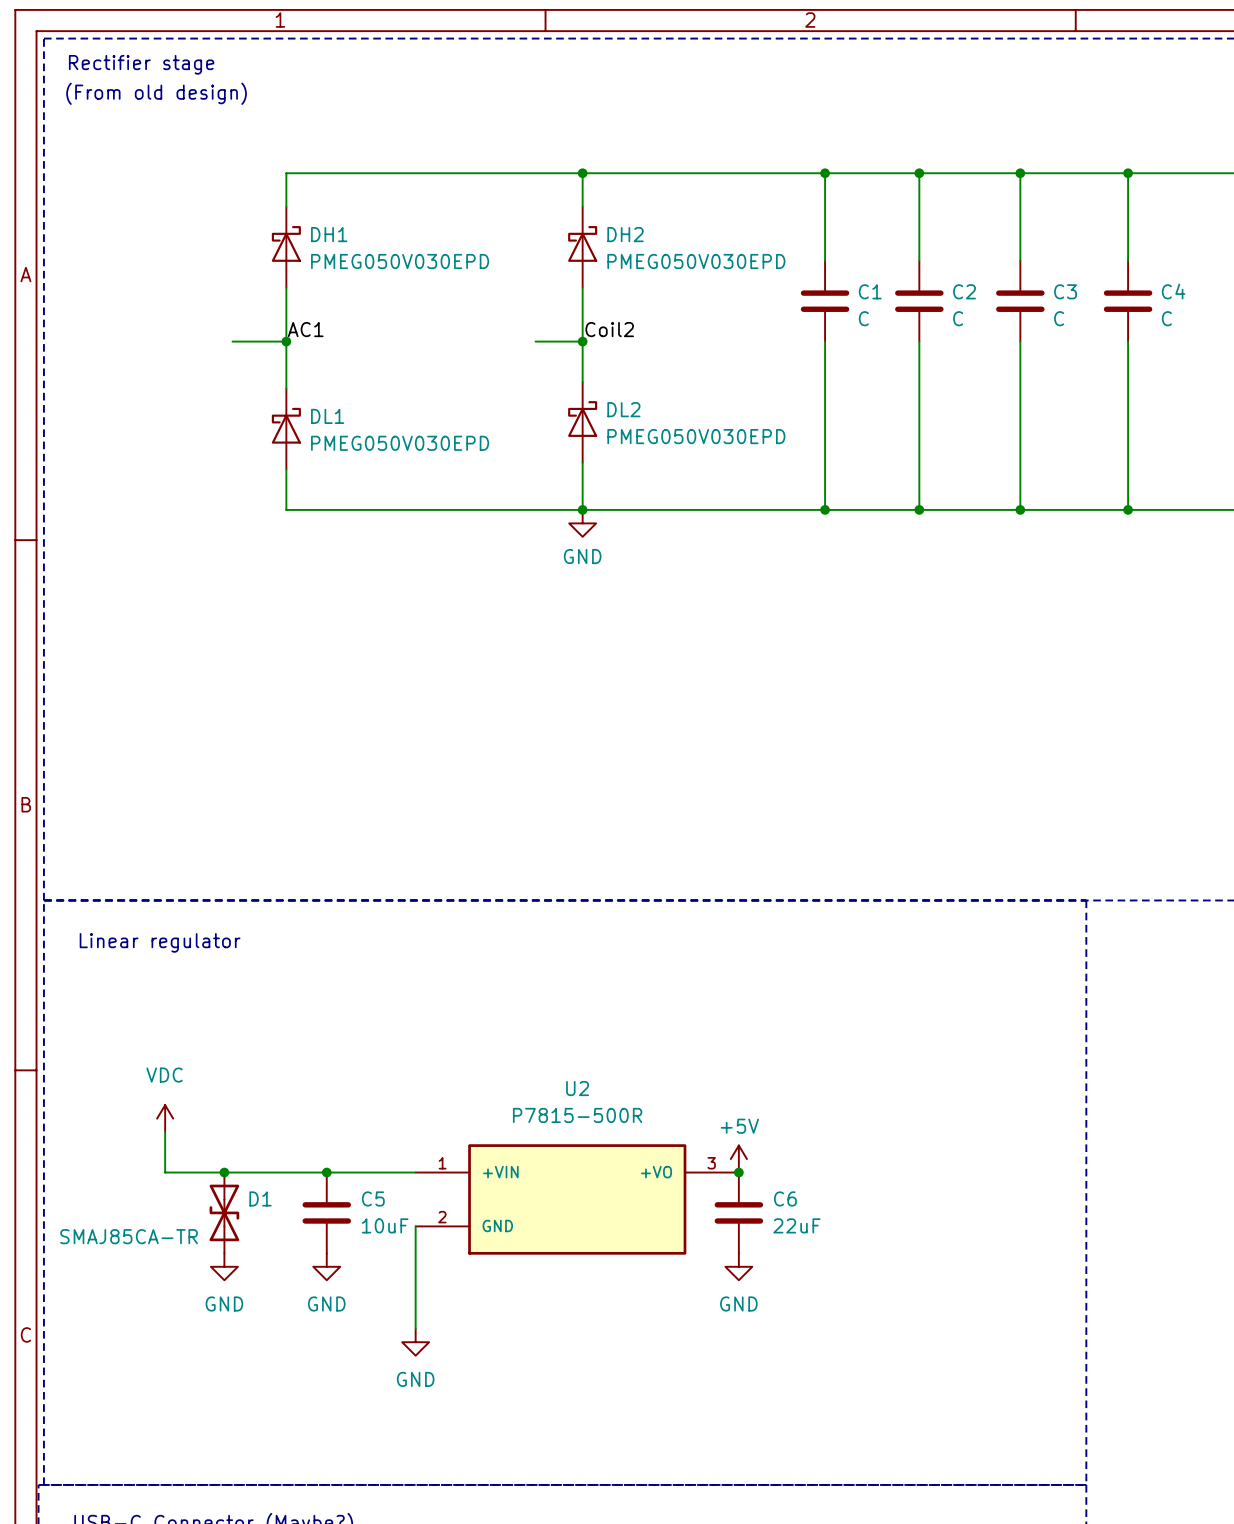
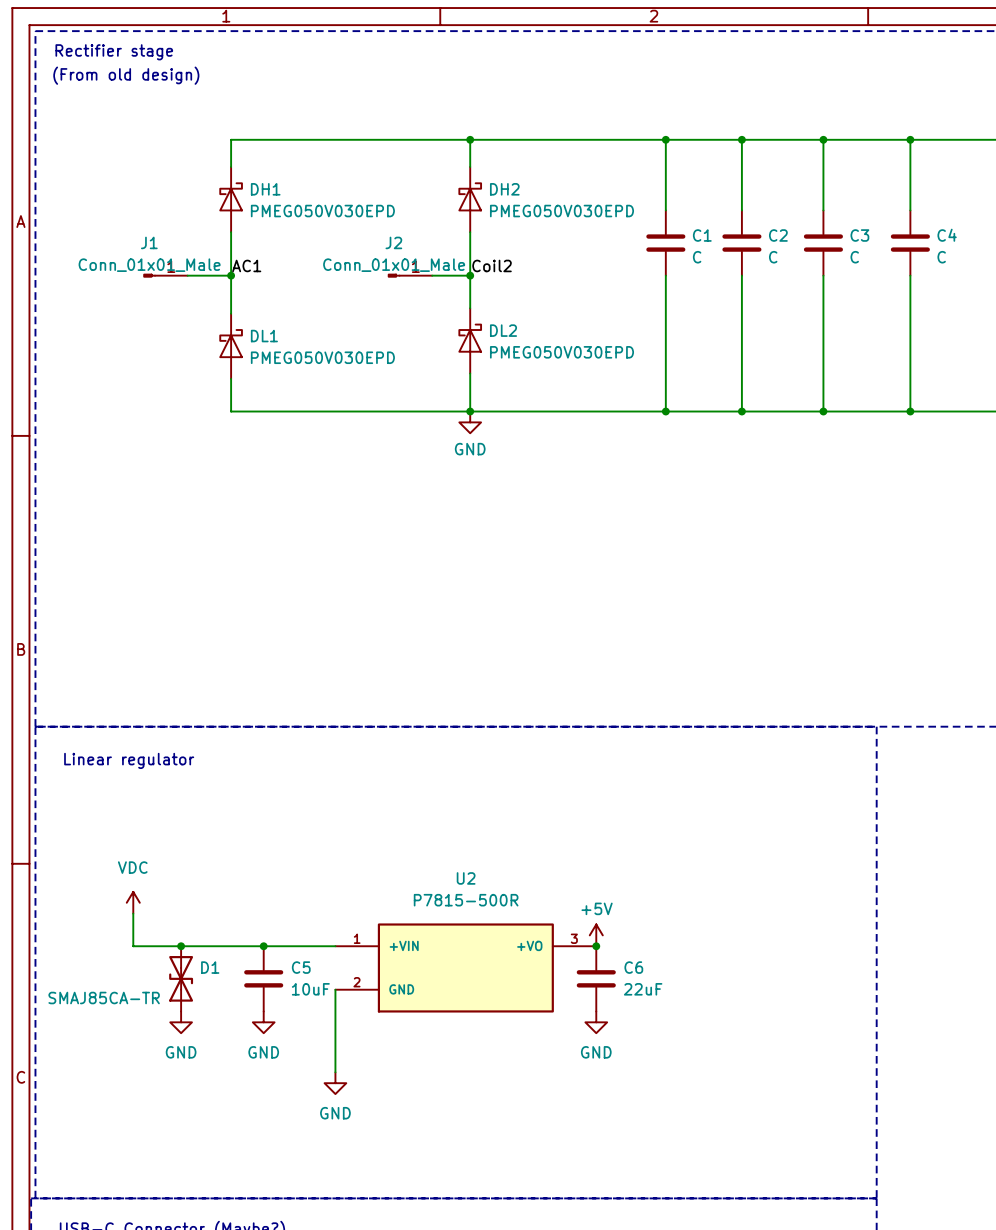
J1: none -> Conn_01x01_Male (165, 275)
J2: none -> Conn_01x01_Male (410, 275)

